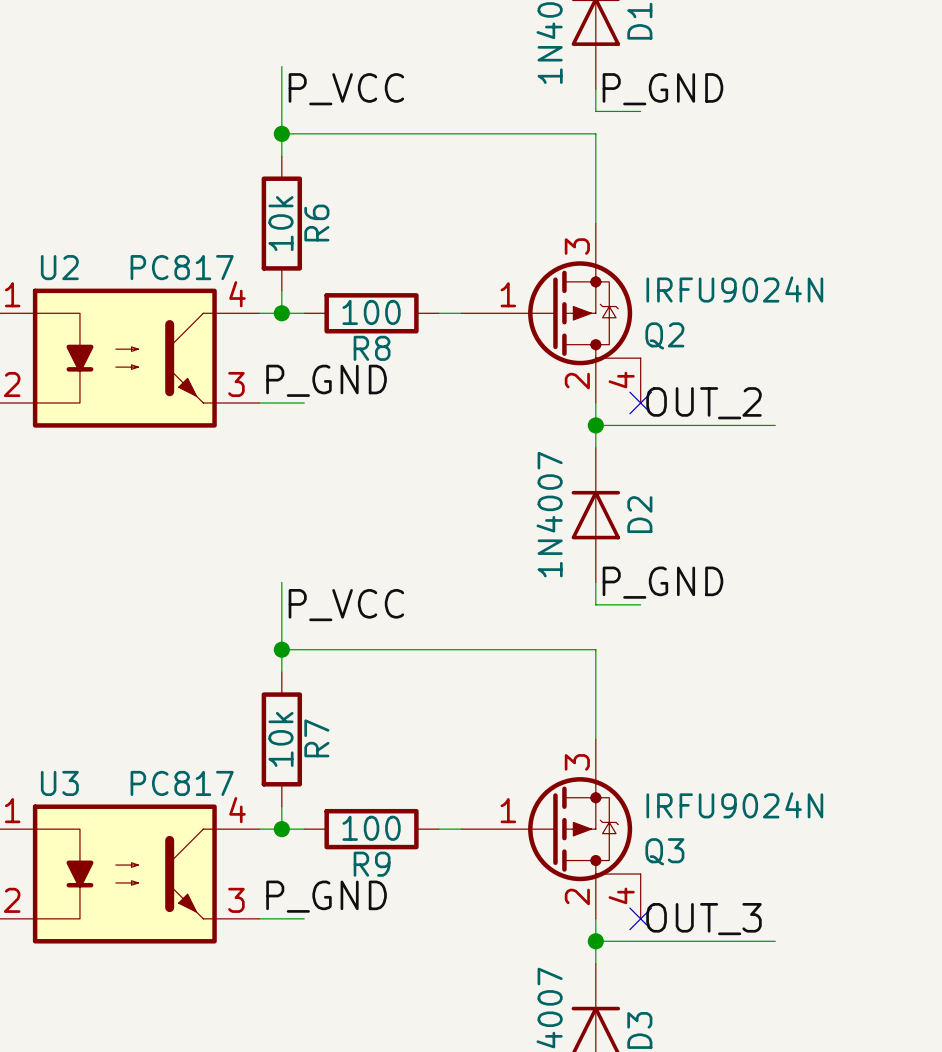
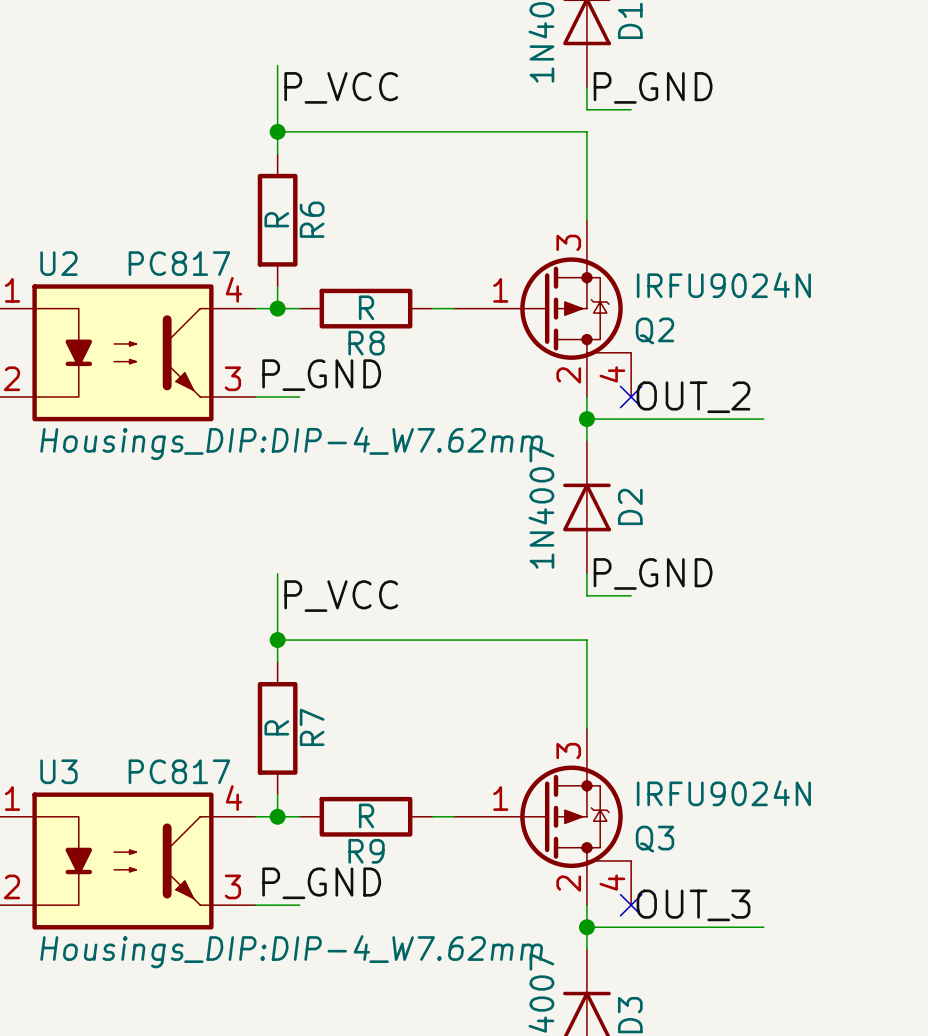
R6 value: 10k (280, 223) -> R (276, 219)
R8 value: 100 (371, 312) -> R (366, 307)
U2 text: none -> Housings_DIP:DIP-4_W7.62mm (291, 443)
R7 value: 10k (280, 739) -> R (276, 727)
R9 value: 100 (371, 828) -> R (366, 815)
U3 text: none -> Housings_DIP:DIP-4_W7.62mm (291, 951)

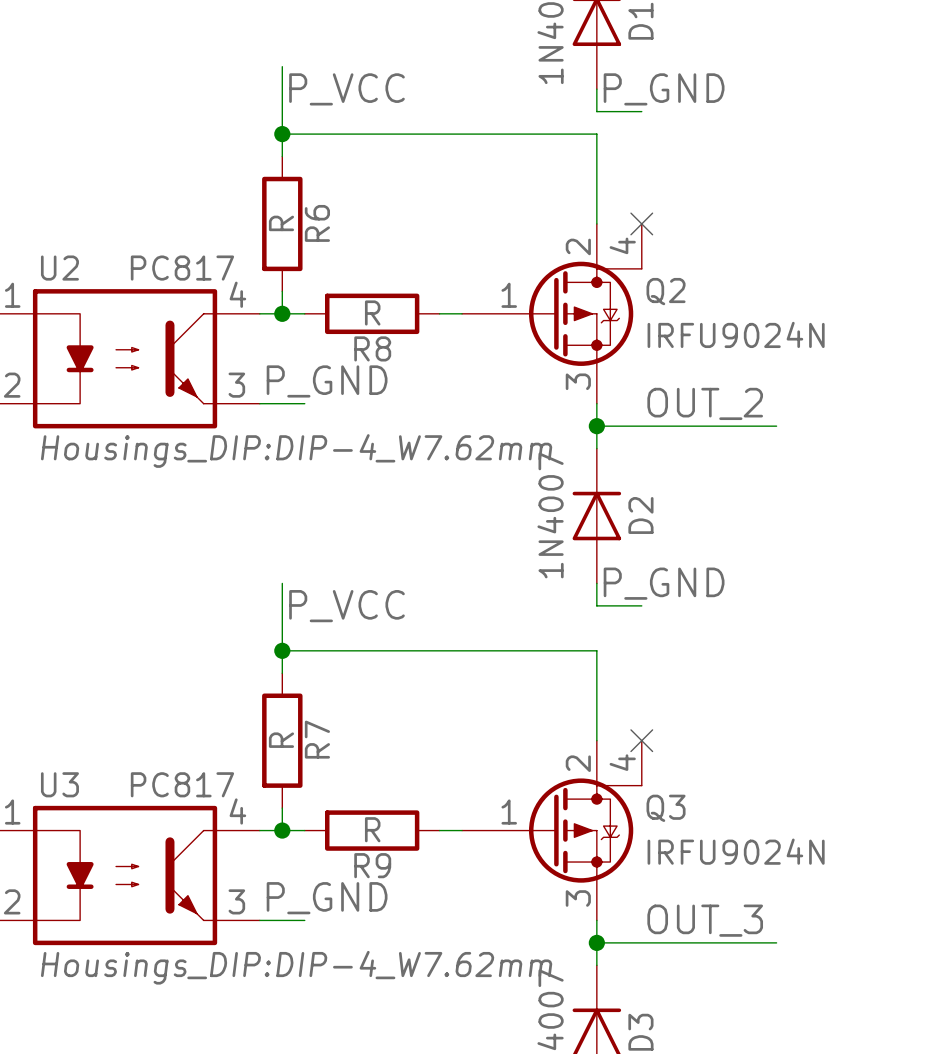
no-connect mark: none -> (641, 223)
Q2 flip: as is (575, 308) -> up-down (585, 313)
no-connect mark: (631, 396) -> none
no-connect mark: none -> (641, 740)
Q3 flip: as is (575, 816) -> up-down (585, 830)
no-connect mark: (631, 905) -> none

